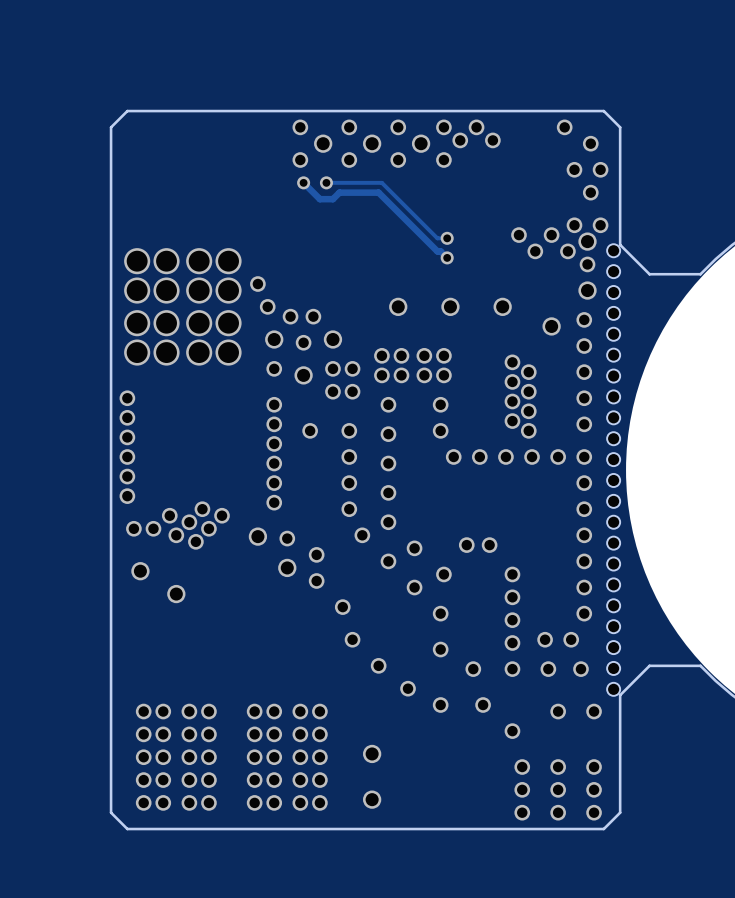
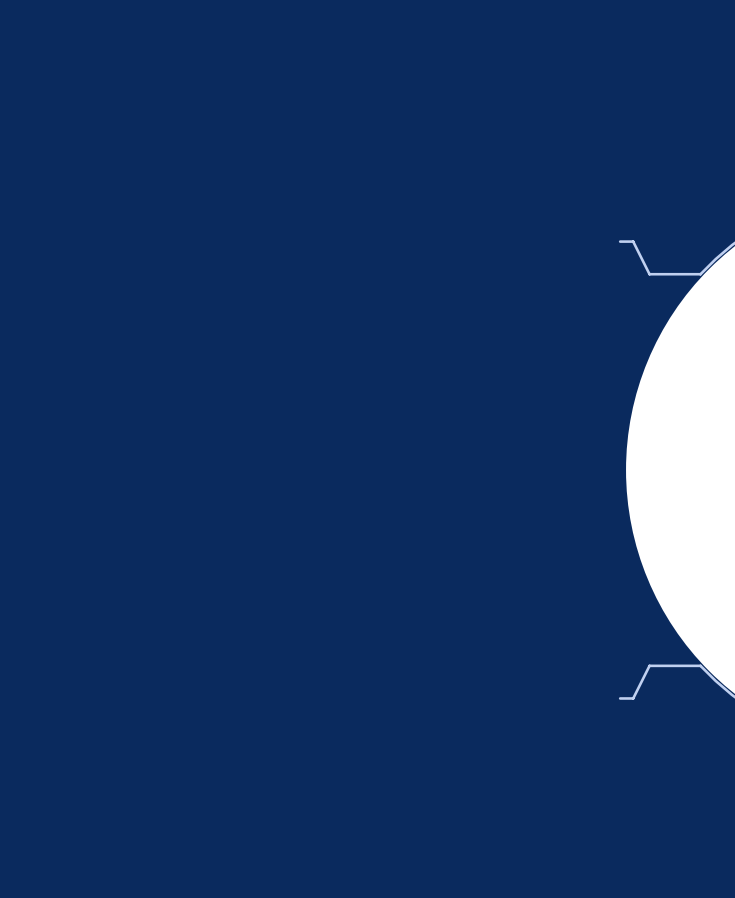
via: (300, 127) -> none
via: (349, 127) -> none
via: (398, 127) -> none
via: (443, 127) -> none
via: (476, 127) -> none
via: (564, 127) -> none
via: (460, 140) -> none
via: (492, 140) -> none
via: (323, 143) -> none
via: (372, 143) -> none
via: (421, 143) -> none
via: (590, 143) -> none
via: (300, 160) -> none
via: (349, 160) -> none
via: (398, 160) -> none
via: (443, 160) -> none
via: (574, 169) -> none
via: (600, 169) -> none
track: (303, 182) (319, 199) (332, 199) (339, 192) (378, 192) (437, 251) (440, 251) (447, 257) -> none
via: (303, 182) -> none
track: (326, 182) (381, 182) (437, 238) (447, 238) -> none
via: (326, 182) -> none
via: (590, 192) -> none
via: (574, 225) -> none
via: (600, 225) -> none
via: (518, 235) -> none
via: (551, 235) -> none
via: (447, 238) -> none
via: (587, 241) -> none
part: (613, 250) -> none
via: (535, 251) -> none
via: (567, 251) -> none
via: (447, 257) -> none
via: (137, 261) -> none
via: (166, 261) -> none
via: (199, 261) -> none
via: (228, 261) -> none
via: (587, 264) -> none
part: (613, 271) -> none
board edge: (649, 274) (620, 244) (620, 127) (603, 111) (127, 111) (111, 127) (111, 812) (127, 829) (603, 829) (620, 812) (620, 695) (649, 665) -> (649, 274) (633, 241) (620, 241)
via: (257, 284) -> none
via: (137, 290) -> none
via: (166, 290) -> none
via: (199, 290) -> none
via: (228, 290) -> none
via: (587, 290) -> none
part: (613, 292) -> none
via: (267, 306) -> none
via: (398, 306) -> none
via: (450, 306) -> none
via: (502, 306) -> none
part: (613, 313) -> none
via: (290, 316) -> none
via: (313, 316) -> none
via: (584, 319) -> none
via: (137, 323) -> none
via: (166, 323) -> none
via: (199, 323) -> none
via: (228, 323) -> none
via: (551, 326) -> none
part: (613, 334) -> none
via: (274, 339) -> none
via: (332, 339) -> none
via: (303, 342) -> none
via: (584, 346) -> none
via: (137, 352) -> none
via: (166, 352) -> none
via: (199, 352) -> none
via: (228, 352) -> none
via: (381, 355) -> none
via: (401, 355) -> none
via: (424, 355) -> none
via: (443, 355) -> none
part: (613, 355) -> none
via: (512, 362) -> none
via: (274, 368) -> none
via: (332, 368) -> none
via: (352, 368) -> none
via: (528, 372) -> none
via: (584, 372) -> none
via: (303, 375) -> none
via: (381, 375) -> none
via: (401, 375) -> none
via: (424, 375) -> none
via: (443, 375) -> none
part: (613, 376) -> none
via: (512, 381) -> none
via: (332, 391) -> none
via: (352, 391) -> none
via: (528, 391) -> none
part: (613, 396) -> none
via: (127, 398) -> none
via: (584, 398) -> none
via: (512, 401) -> none
via: (274, 404) -> none
via: (388, 404) -> none
via: (440, 404) -> none
via: (528, 411) -> none
via: (127, 417) -> none
part: (613, 417) -> none
via: (512, 421) -> none
via: (274, 424) -> none
via: (584, 424) -> none
via: (310, 430) -> none
via: (349, 430) -> none
via: (440, 430) -> none
via: (528, 430) -> none
via: (388, 434) -> none
via: (127, 437) -> none
part: (613, 438) -> none
via: (274, 443) -> none
via: (127, 456) -> none
via: (349, 456) -> none
via: (453, 456) -> none
via: (479, 456) -> none
via: (505, 456) -> none
via: (532, 456) -> none
via: (558, 456) -> none
via: (584, 456) -> none
part: (613, 459) -> none
via: (274, 463) -> none
via: (388, 463) -> none
via: (127, 476) -> none
part: (613, 480) -> none
via: (274, 483) -> none
via: (349, 483) -> none
via: (584, 483) -> none
via: (388, 492) -> none
via: (127, 496) -> none
part: (613, 501) -> none
via: (274, 502) -> none
via: (202, 509) -> none
via: (349, 509) -> none
via: (584, 509) -> none
via: (169, 515) -> none
via: (222, 515) -> none
via: (189, 522) -> none
via: (388, 522) -> none
part: (613, 522) -> none
via: (133, 528) -> none
via: (153, 528) -> none
via: (208, 528) -> none
via: (176, 535) -> none
via: (362, 535) -> none
via: (584, 535) -> none
via: (257, 536) -> none
via: (287, 538) -> none
via: (195, 541) -> none
part: (613, 543) -> none
via: (466, 545) -> none
via: (489, 545) -> none
via: (414, 548) -> none
via: (316, 554) -> none
via: (388, 561) -> none
via: (584, 561) -> none
part: (613, 564) -> none
via: (287, 567) -> none
via: (140, 571) -> none
via: (443, 574) -> none
via: (512, 574) -> none
via: (316, 580) -> none
part: (613, 584) -> none
via: (414, 587) -> none
via: (584, 587) -> none
via: (176, 594) -> none
via: (512, 597) -> none
part: (613, 605) -> none
via: (342, 607) -> none
via: (440, 613) -> none
via: (584, 613) -> none
via: (512, 620) -> none
part: (613, 626) -> none
via: (352, 639) -> none
via: (545, 639) -> none
via: (571, 639) -> none
via: (512, 643) -> none
part: (613, 647) -> none
via: (440, 649) -> none
via: (378, 665) -> none
board edge: none -> (649, 665) (633, 698) (620, 698)
part: (613, 668) -> none
via: (473, 669) -> none
via: (512, 669) -> none
via: (548, 669) -> none
via: (580, 669) -> none
via: (408, 688) -> none
part: (613, 689) -> none
via: (440, 705) -> none
via: (483, 705) -> none
via: (143, 711) -> none
via: (163, 711) -> none
via: (189, 711) -> none
via: (208, 711) -> none
via: (254, 711) -> none
via: (274, 711) -> none
via: (300, 711) -> none
via: (319, 711) -> none
via: (558, 711) -> none
via: (594, 711) -> none
via: (512, 731) -> none
via: (143, 734) -> none
via: (163, 734) -> none
via: (189, 734) -> none
via: (208, 734) -> none
via: (254, 734) -> none
via: (274, 734) -> none
via: (300, 734) -> none
via: (319, 734) -> none
via: (372, 753) -> none
via: (143, 757) -> none
via: (163, 757) -> none
via: (189, 757) -> none
via: (208, 757) -> none
via: (254, 757) -> none
via: (274, 757) -> none
via: (300, 757) -> none
via: (319, 757) -> none
via: (522, 767) -> none
via: (558, 767) -> none
via: (594, 767) -> none
via: (143, 780) -> none
via: (163, 780) -> none
via: (189, 780) -> none
via: (208, 780) -> none
via: (254, 780) -> none
via: (274, 780) -> none
via: (300, 780) -> none
via: (319, 780) -> none
via: (522, 789) -> none
via: (558, 789) -> none
via: (594, 789) -> none
via: (372, 799) -> none
via: (143, 802) -> none
via: (163, 802) -> none
via: (189, 802) -> none
via: (208, 802) -> none
via: (254, 802) -> none
via: (274, 802) -> none
via: (300, 802) -> none
via: (319, 802) -> none
via: (522, 812) -> none
via: (558, 812) -> none
via: (594, 812) -> none

